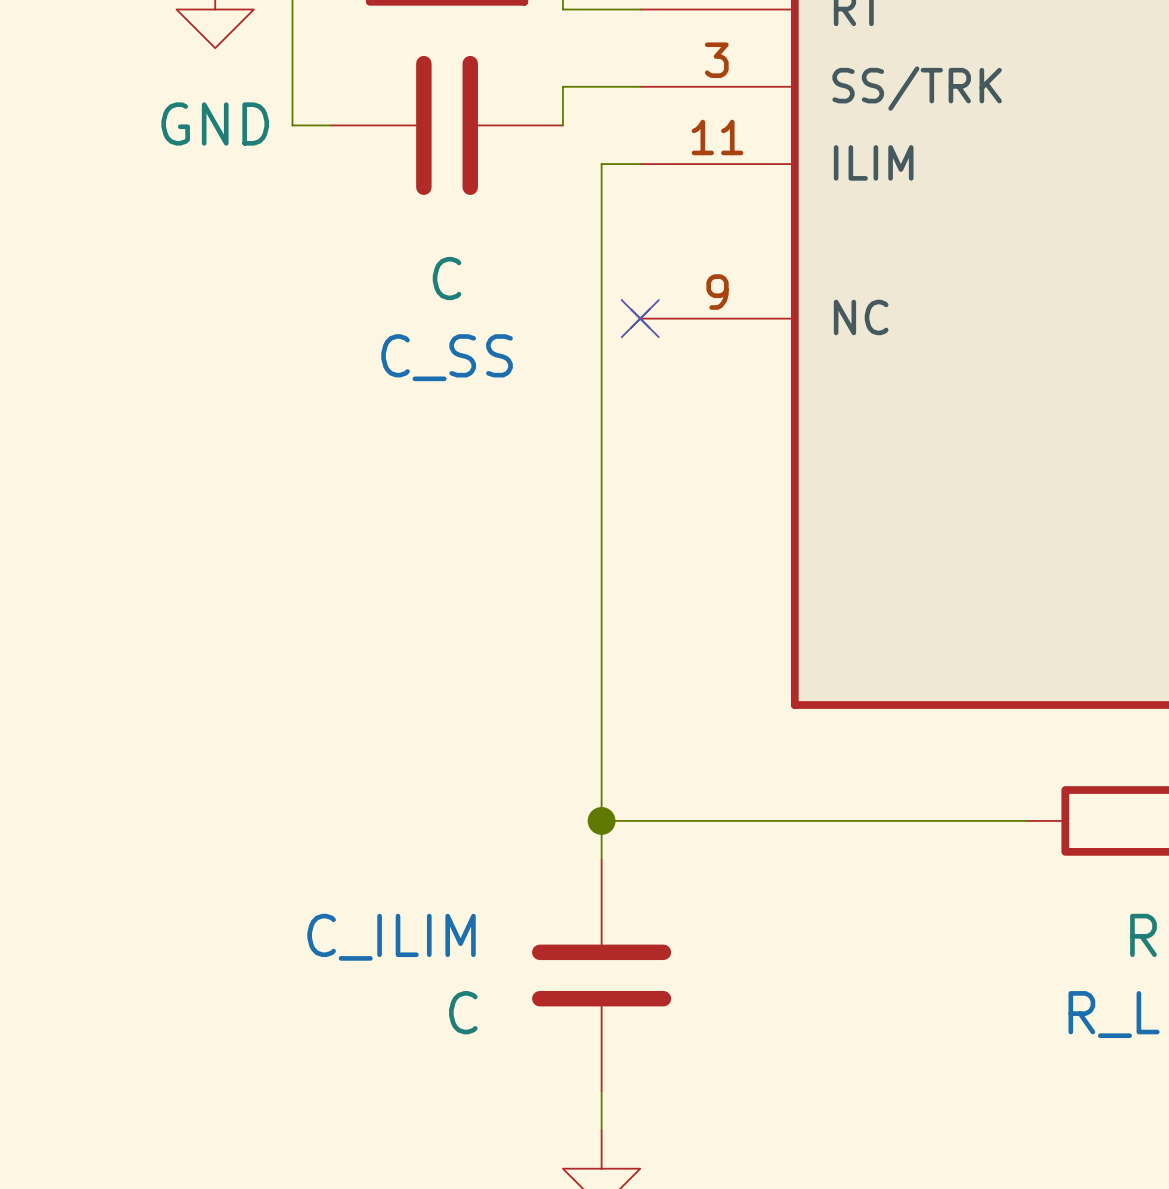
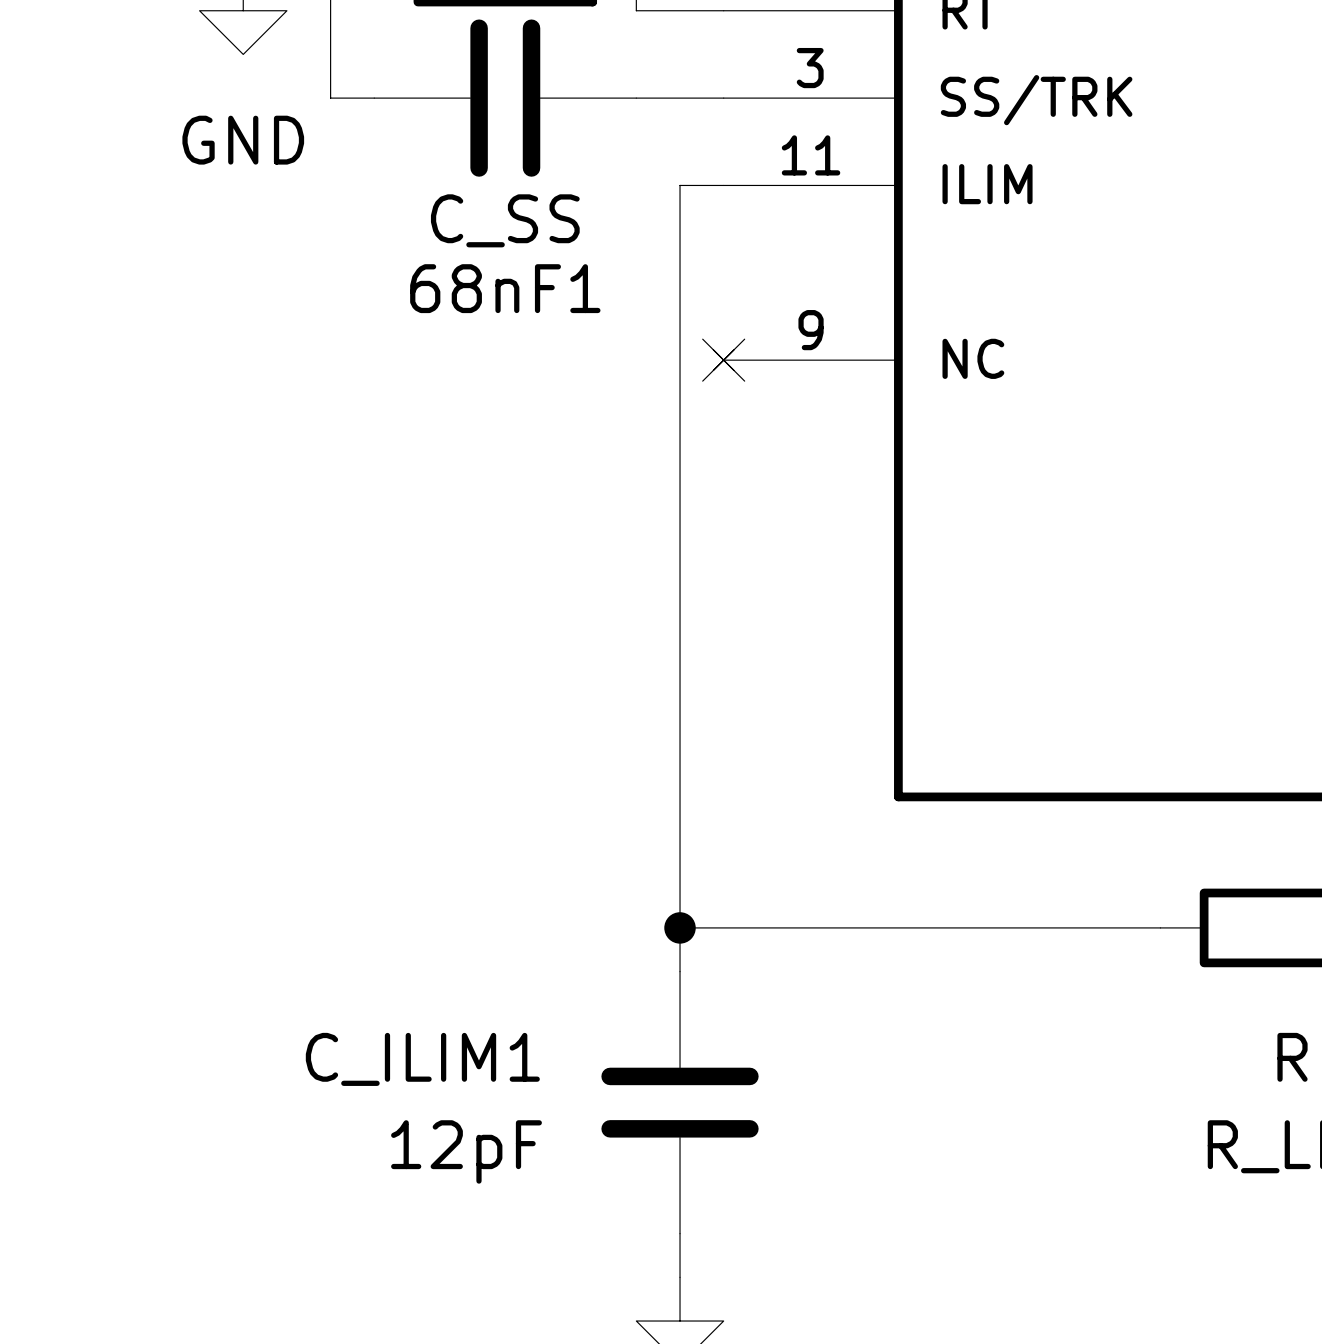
wire: (292, 86) (292, 125) (331, 125) -> (330, 98) (374, 98)
68nF1: none -> C_SS (505, 98)
wire: (562, 86) (562, 125) -> none
C_SS: C (447, 125) -> none
C_ILIM name: C_ILIM (391, 937) -> C_ILIM1 (422, 1059)
C_ILIM value: C (463, 1012) -> 12pF (466, 1151)

